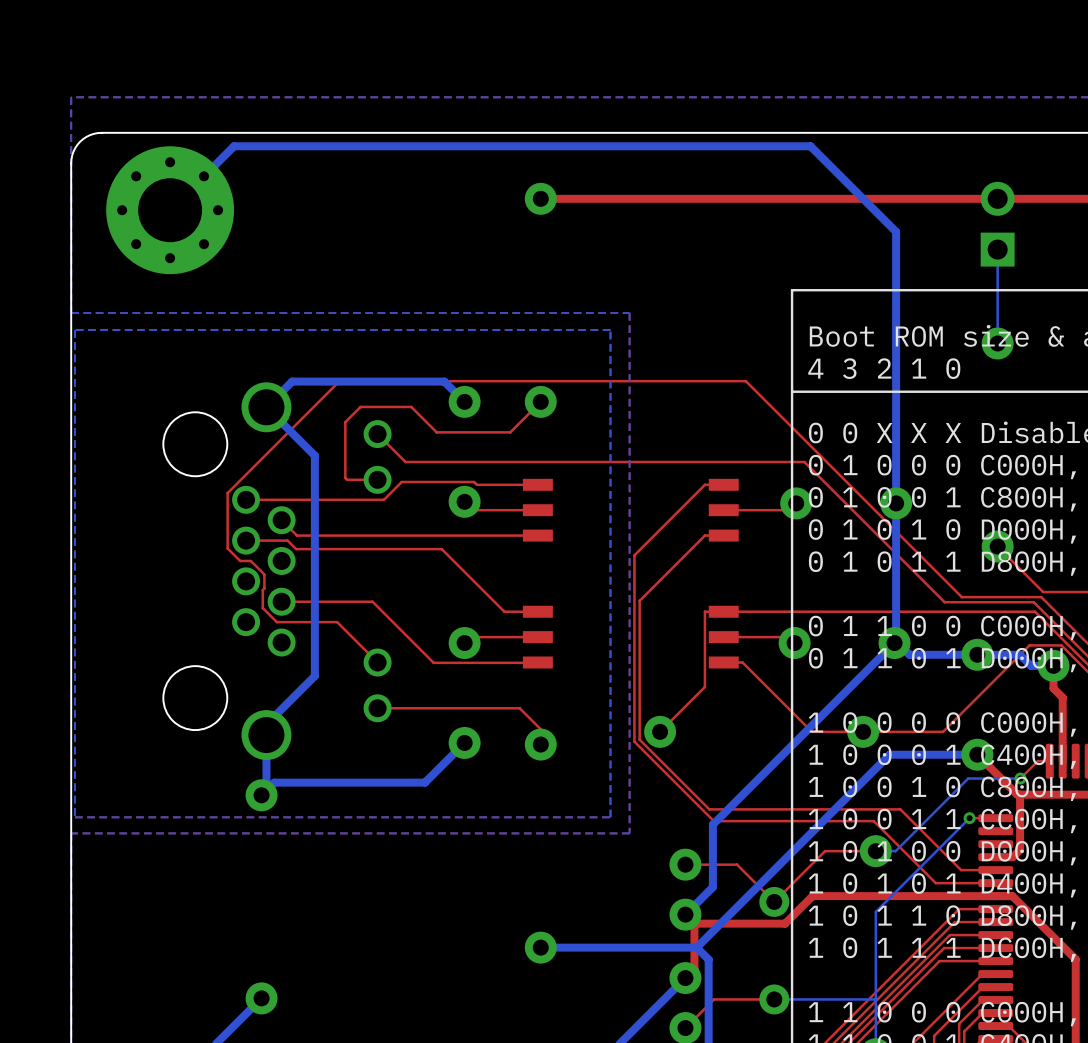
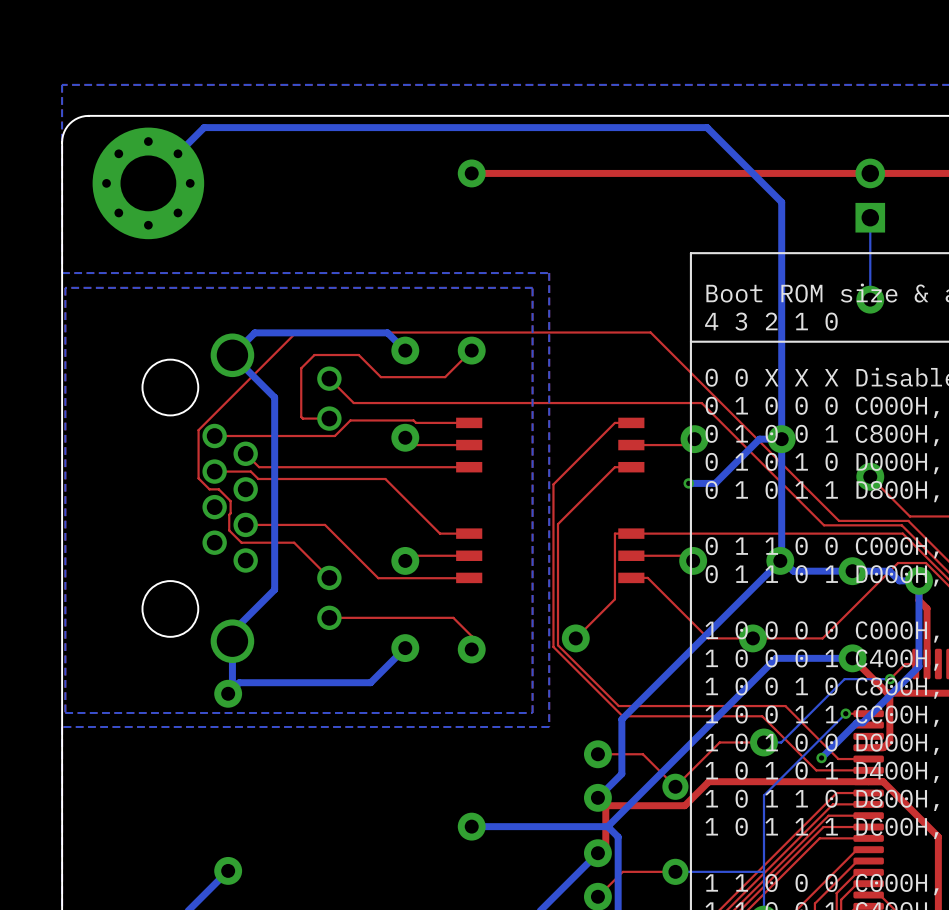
bottom track: none -> (781, 439) (759, 439) (715, 483) (688, 483)
via: none -> (688, 483)
bottom track: none -> (918, 580) (918, 666) (862, 722) (856, 722) (821, 757)
via: none -> (821, 757)

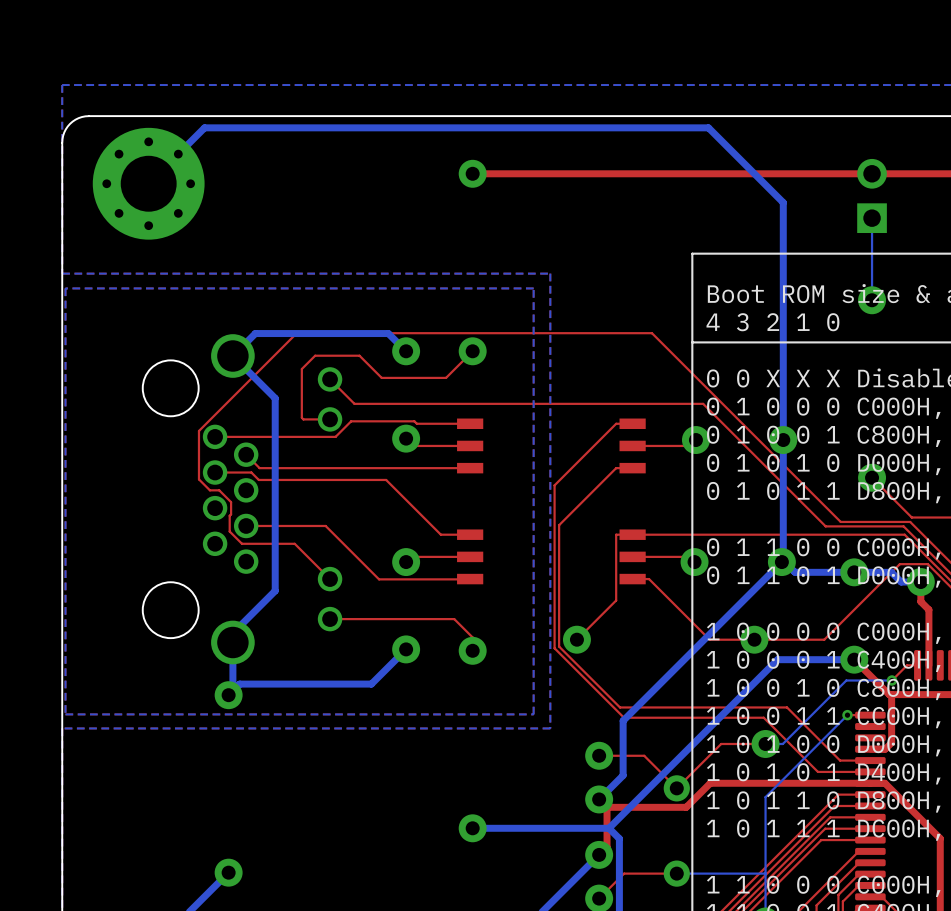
bottom track: (781, 439) (759, 439) (715, 483) (688, 483) -> none
via: (688, 483) -> none
bottom track: (918, 580) (918, 666) (862, 722) (856, 722) (821, 757) -> none
via: (821, 757) -> none

